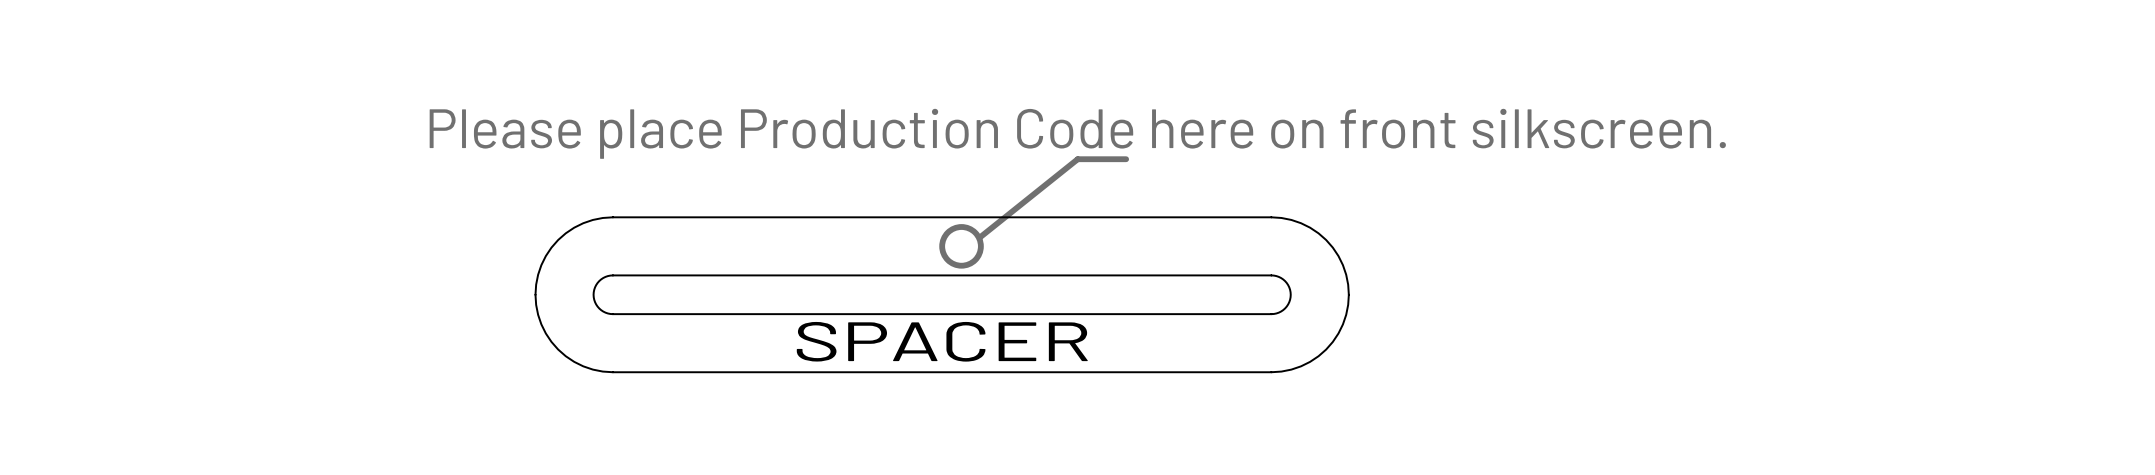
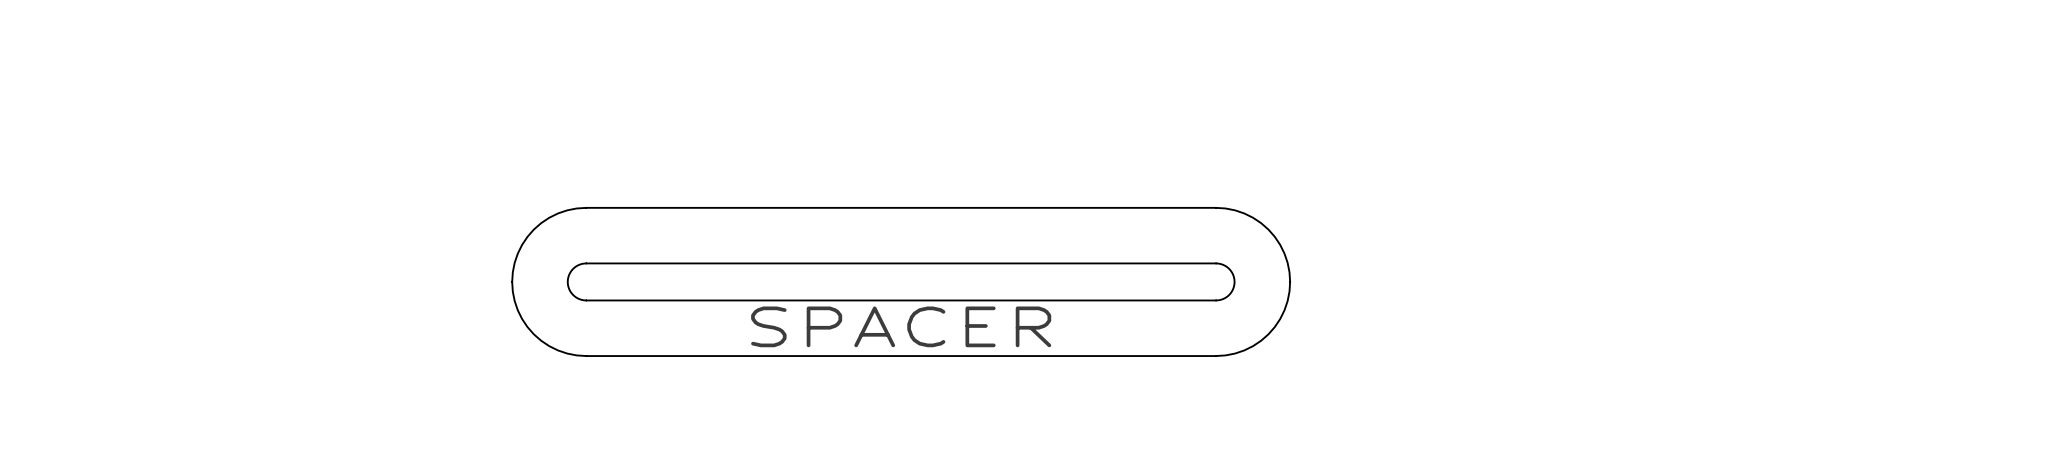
text: Please place Production Code here on front silkscreen. (1077, 133) -> none
line: (1126, 159) (1077, 159) (980, 236) -> none
drawing: [939, 224, 984, 269] -> none

